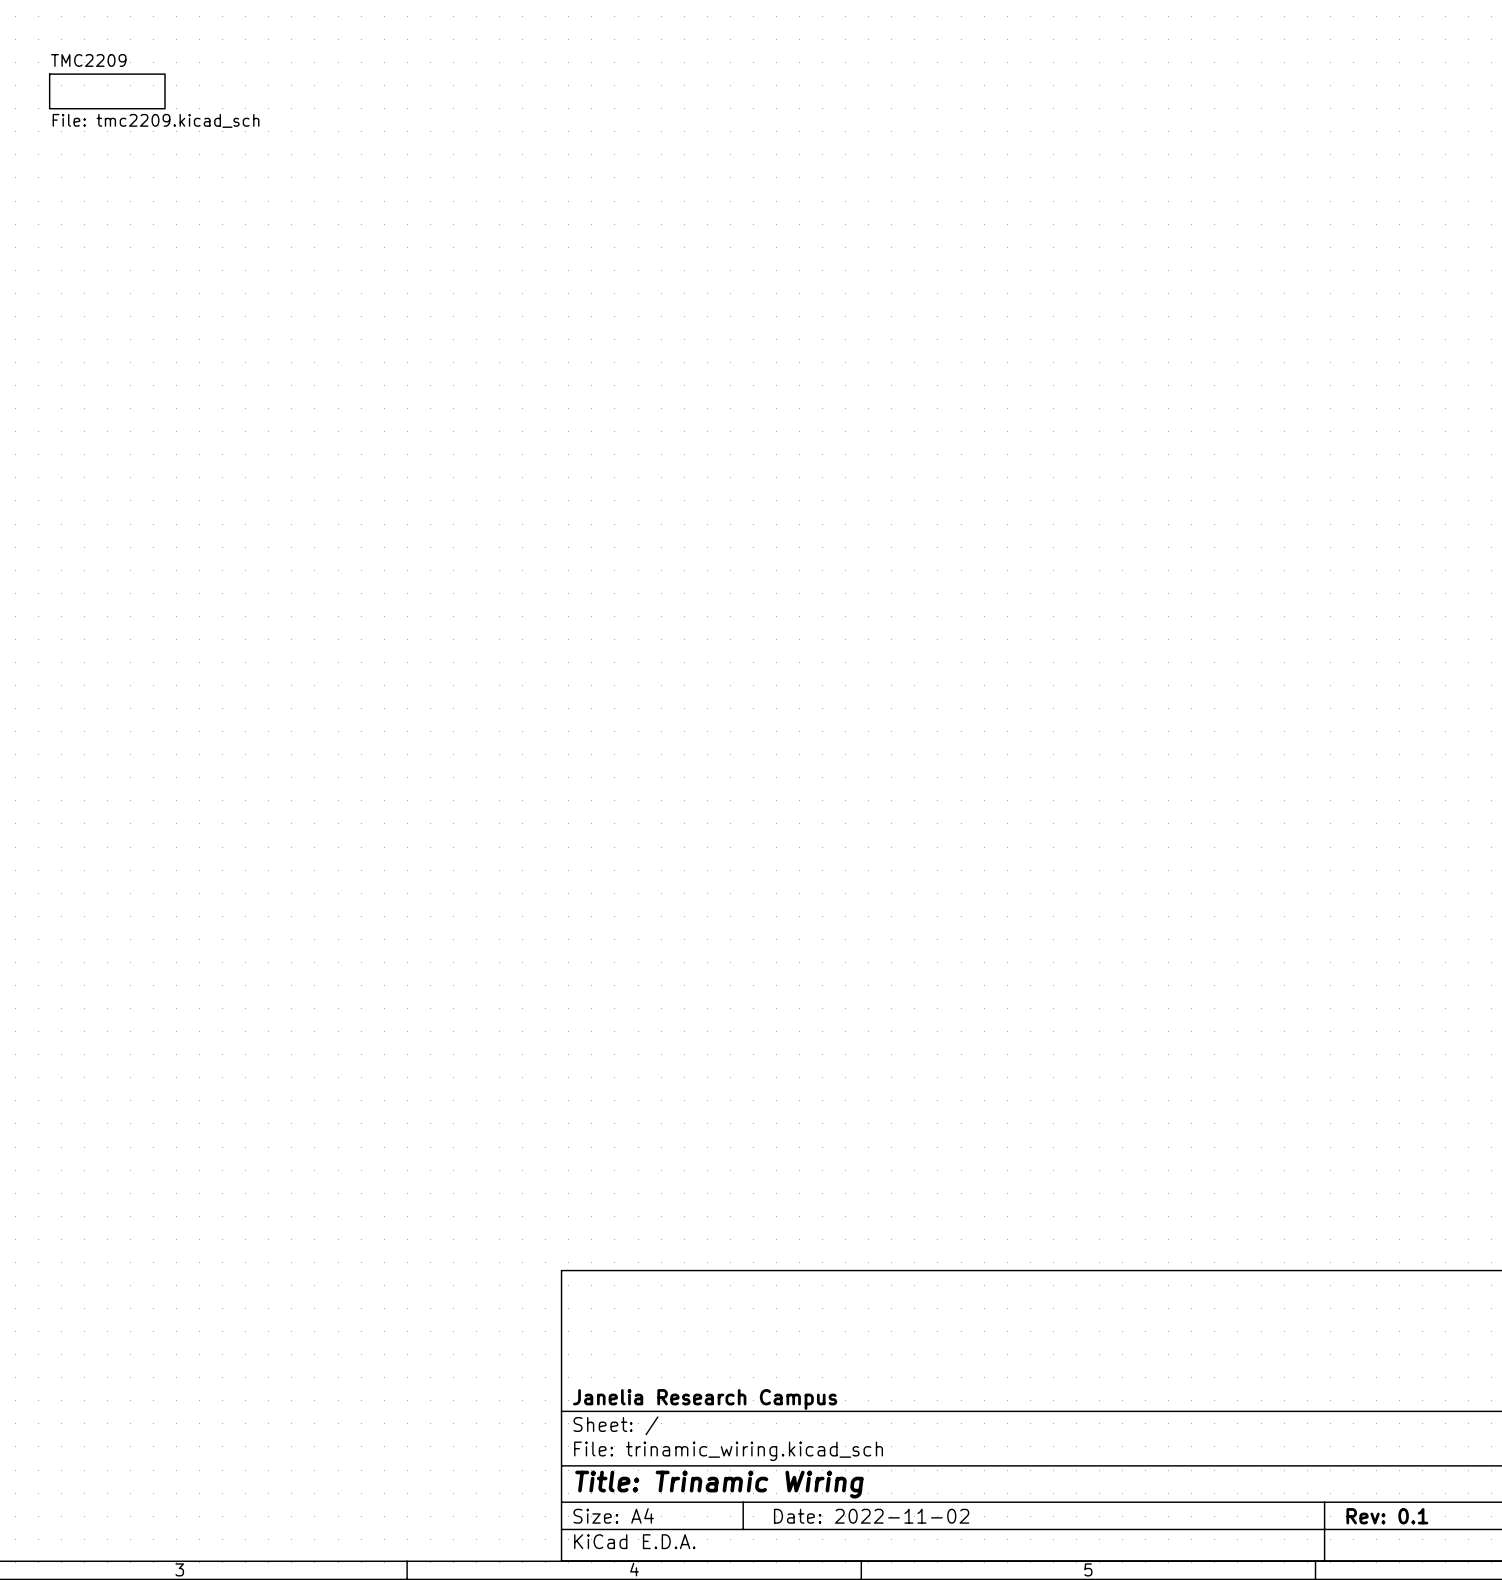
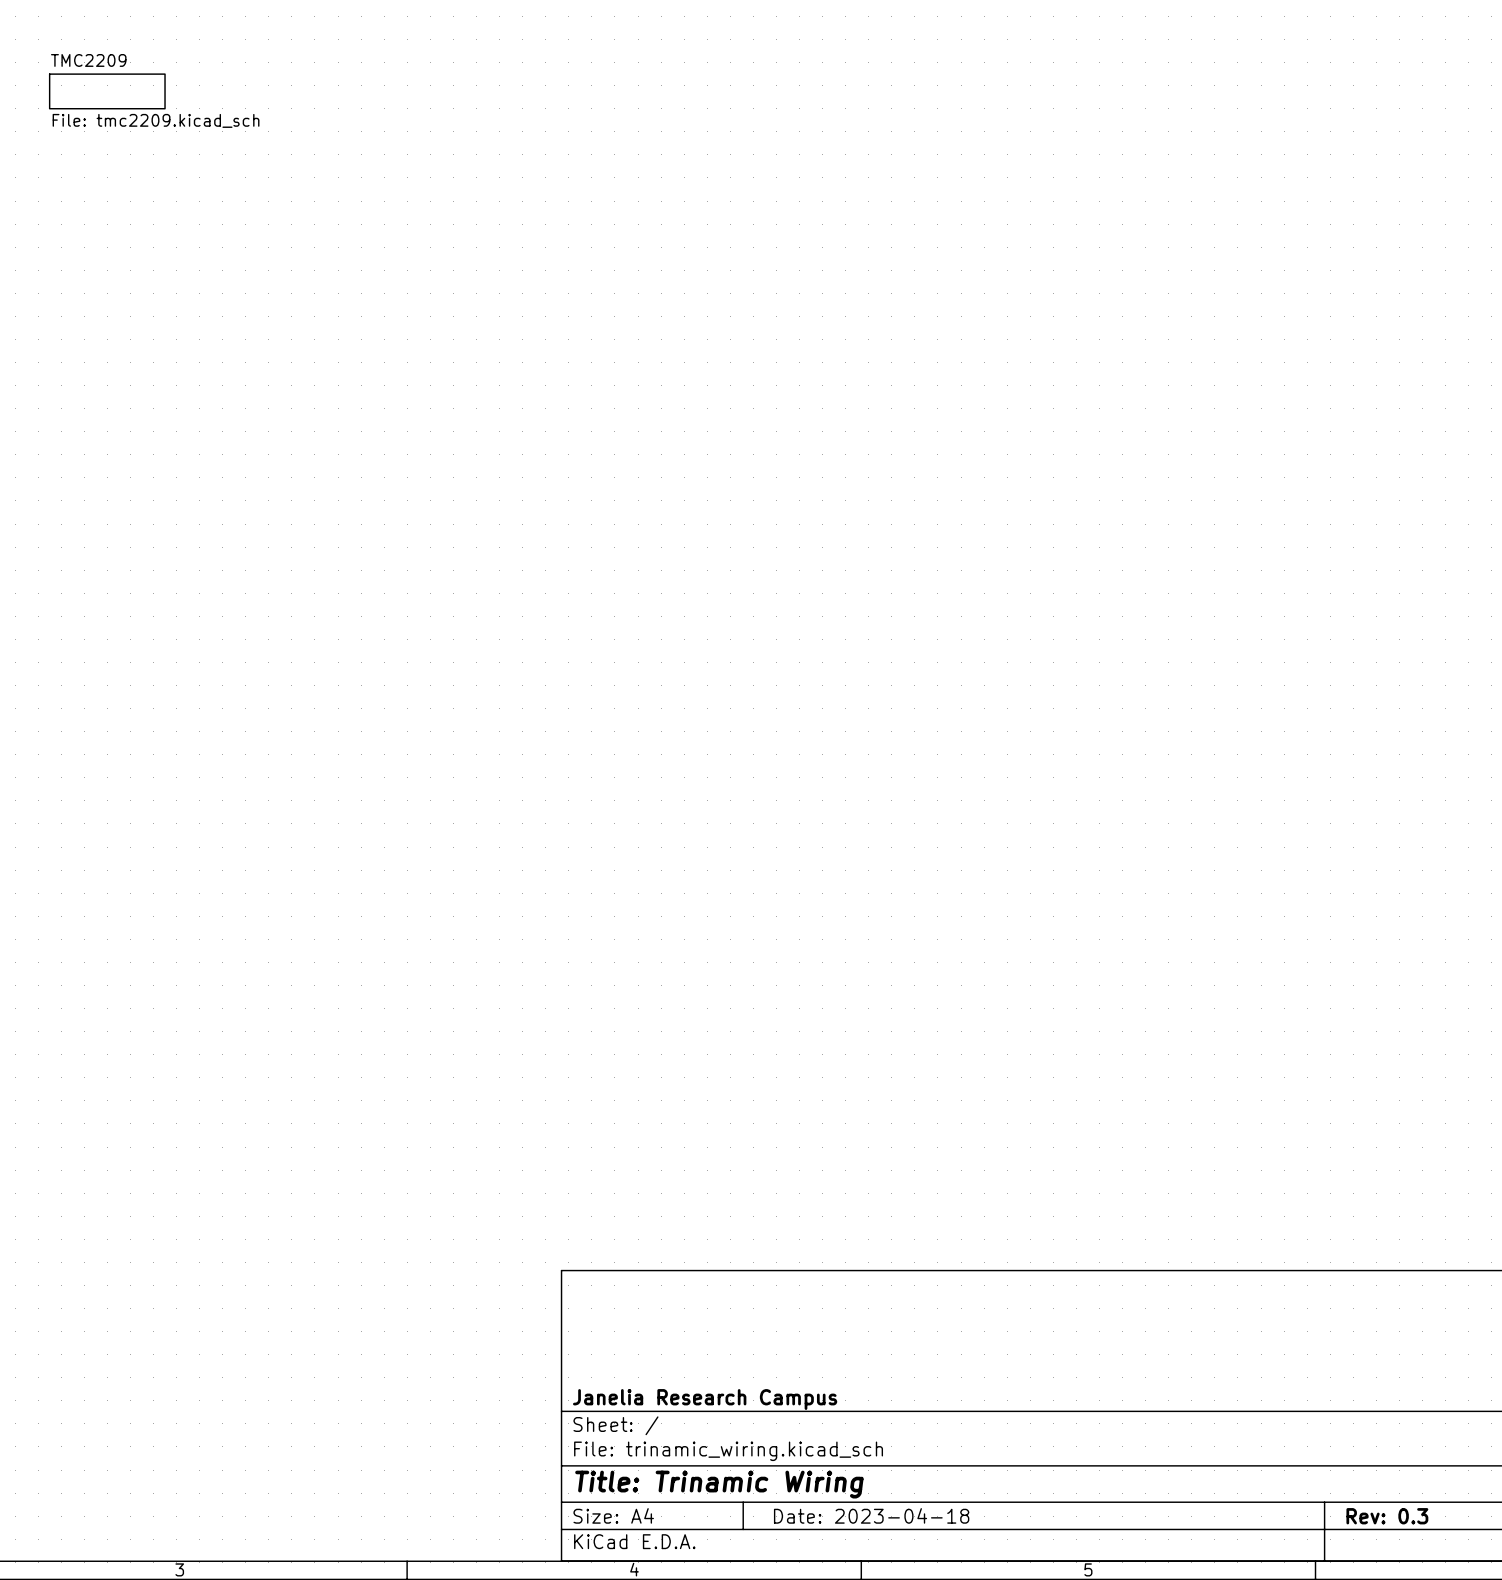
title block: Date: 2022-11-02 (871, 1516) -> Date: 2023-04-18 (871, 1515)
title block: Rev: 0.1 (1387, 1516) -> Rev: 0.3 (1387, 1516)

